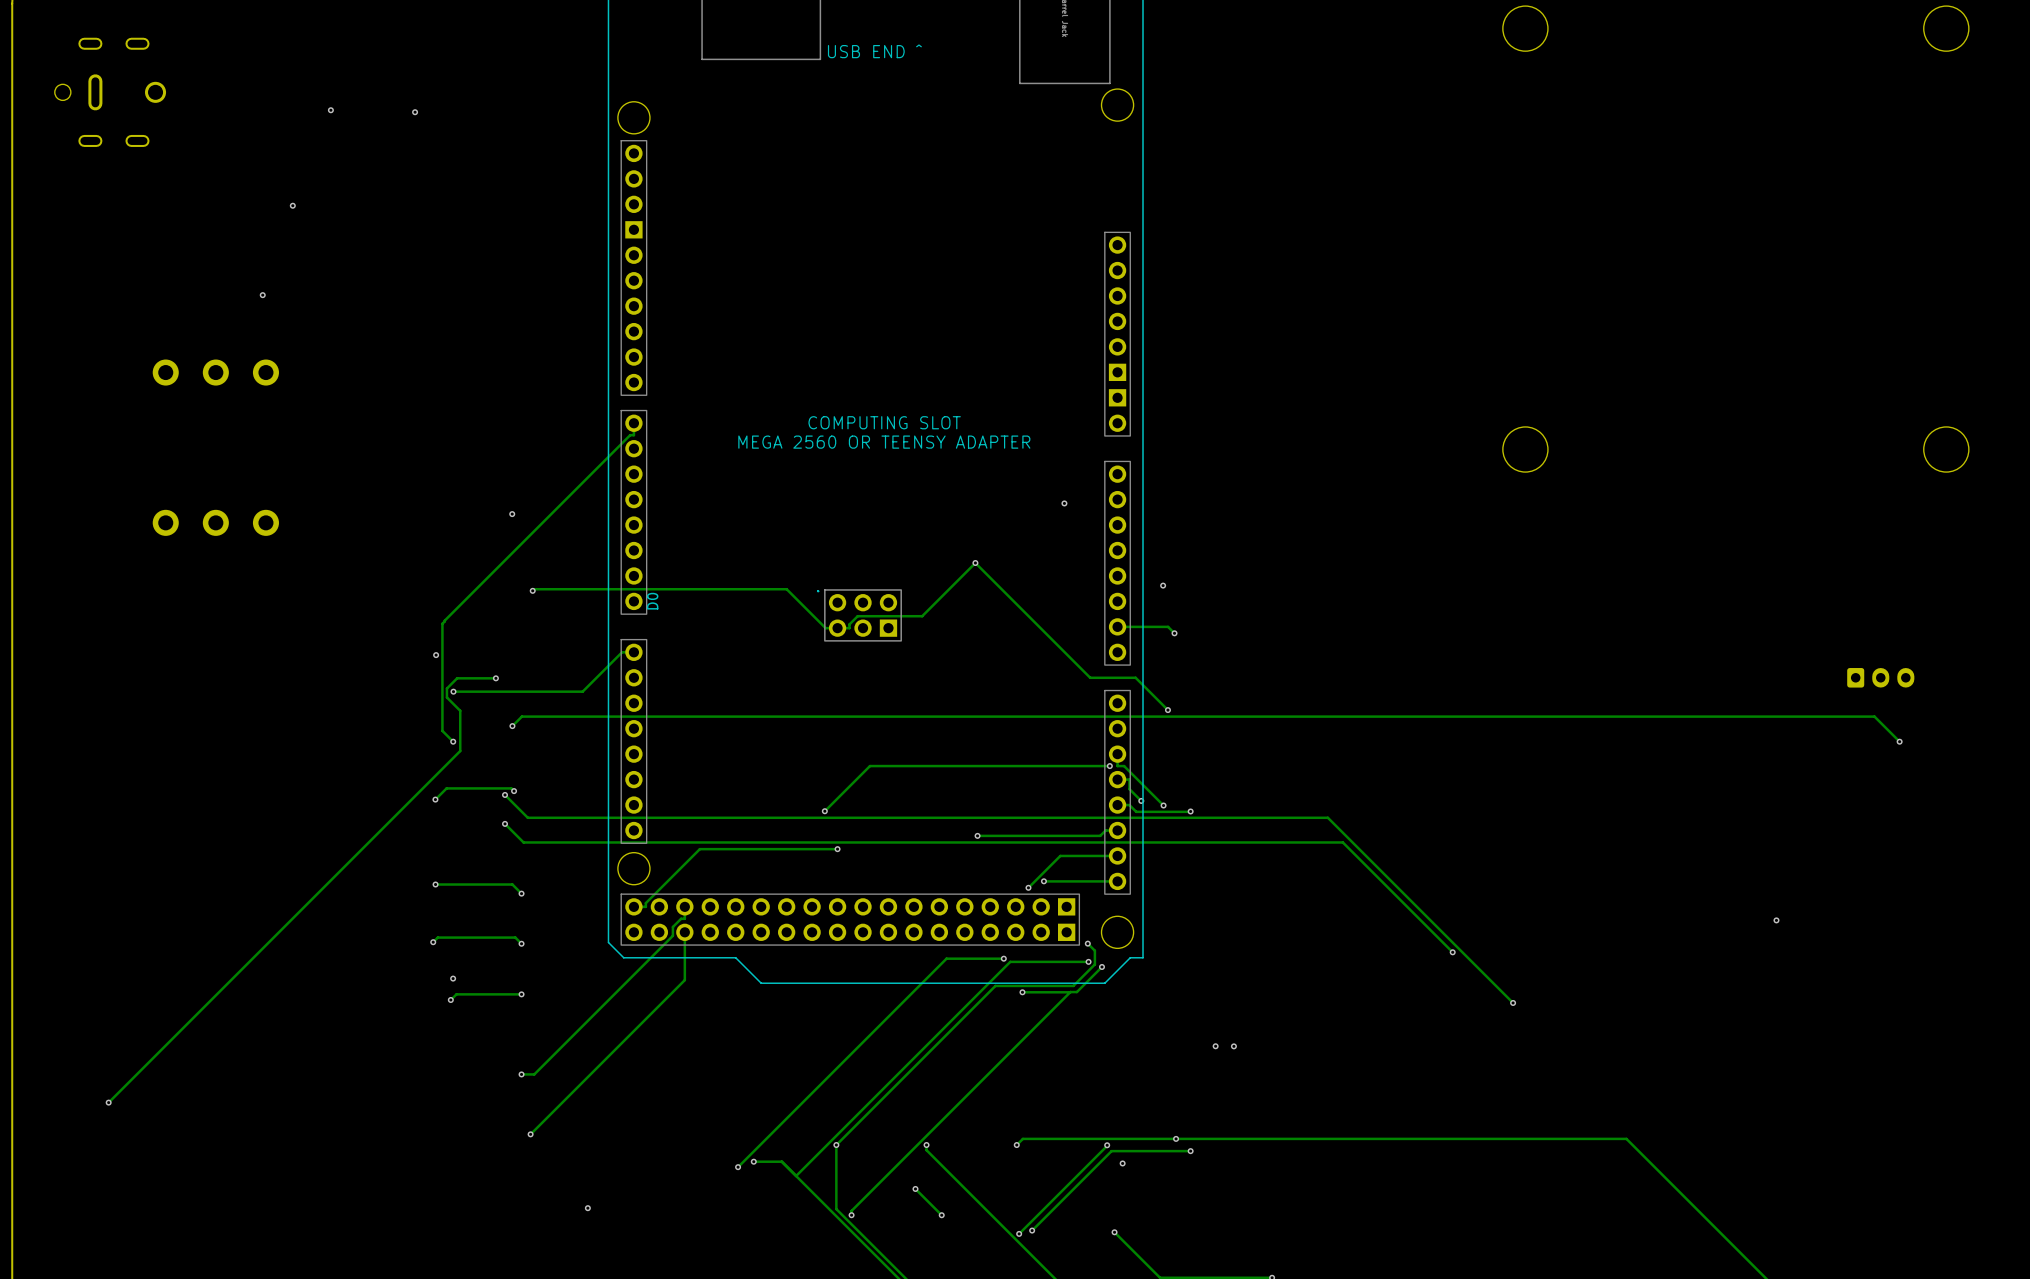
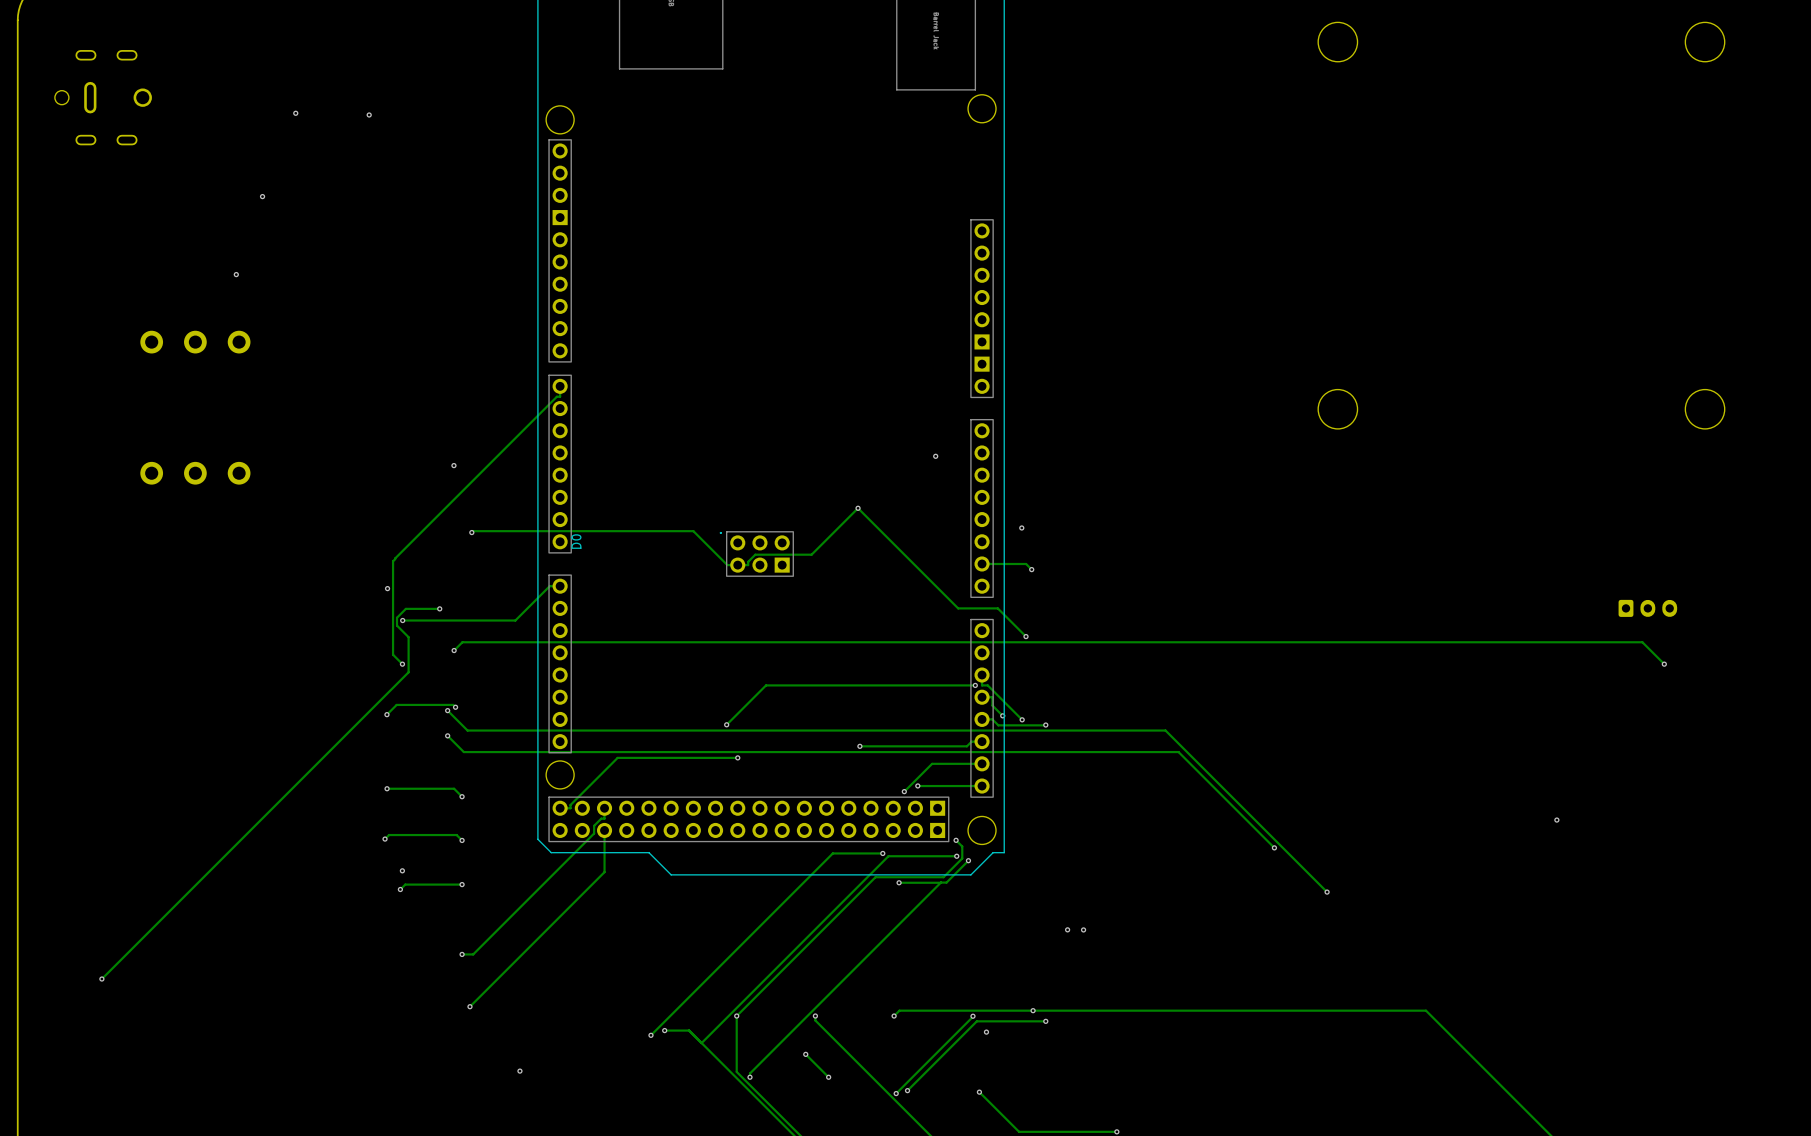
text: USB END ^ (874, 51) -> none
text: COMPUTING SLOT (884, 422) -> none
text: MEGA 2560 OR TEENSY ADAPTER (884, 442) -> none

